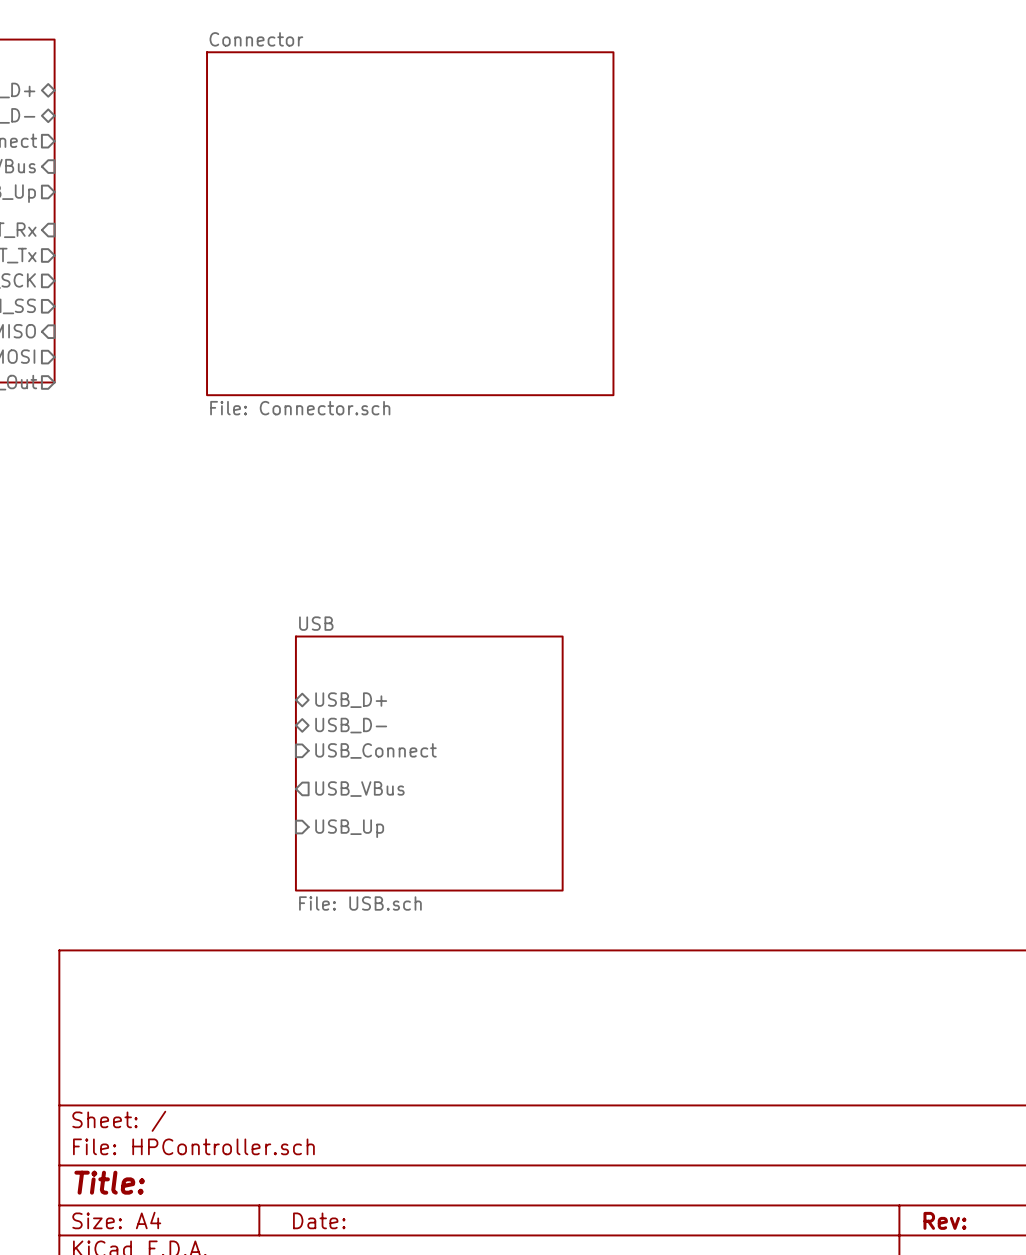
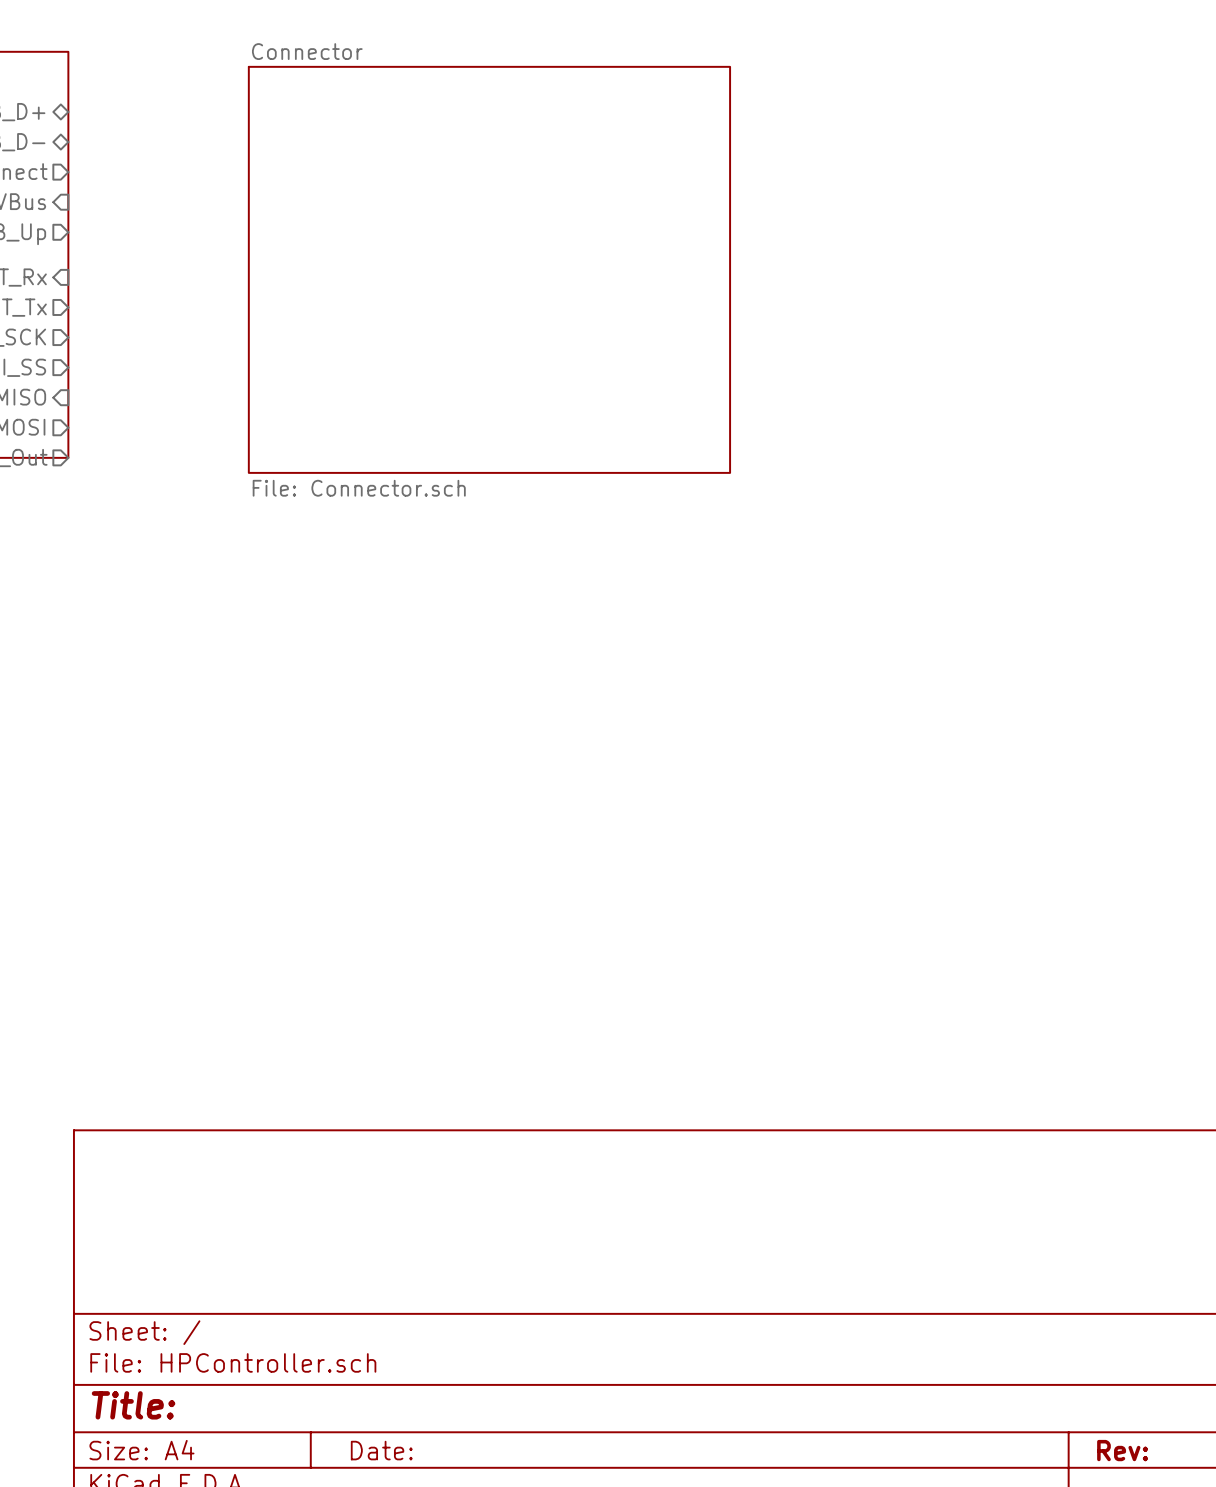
sheet pin: USB_D+ (351, 700) -> none
sheet pin: USB_D- (351, 725) -> none
sheet pin: USB_Connect (375, 750) -> none
sheet USB: File: USB.sch (429, 763) -> none
sheet pin: USB_VBus (359, 789) -> none
sheet pin: USB_Up (349, 828) -> none

